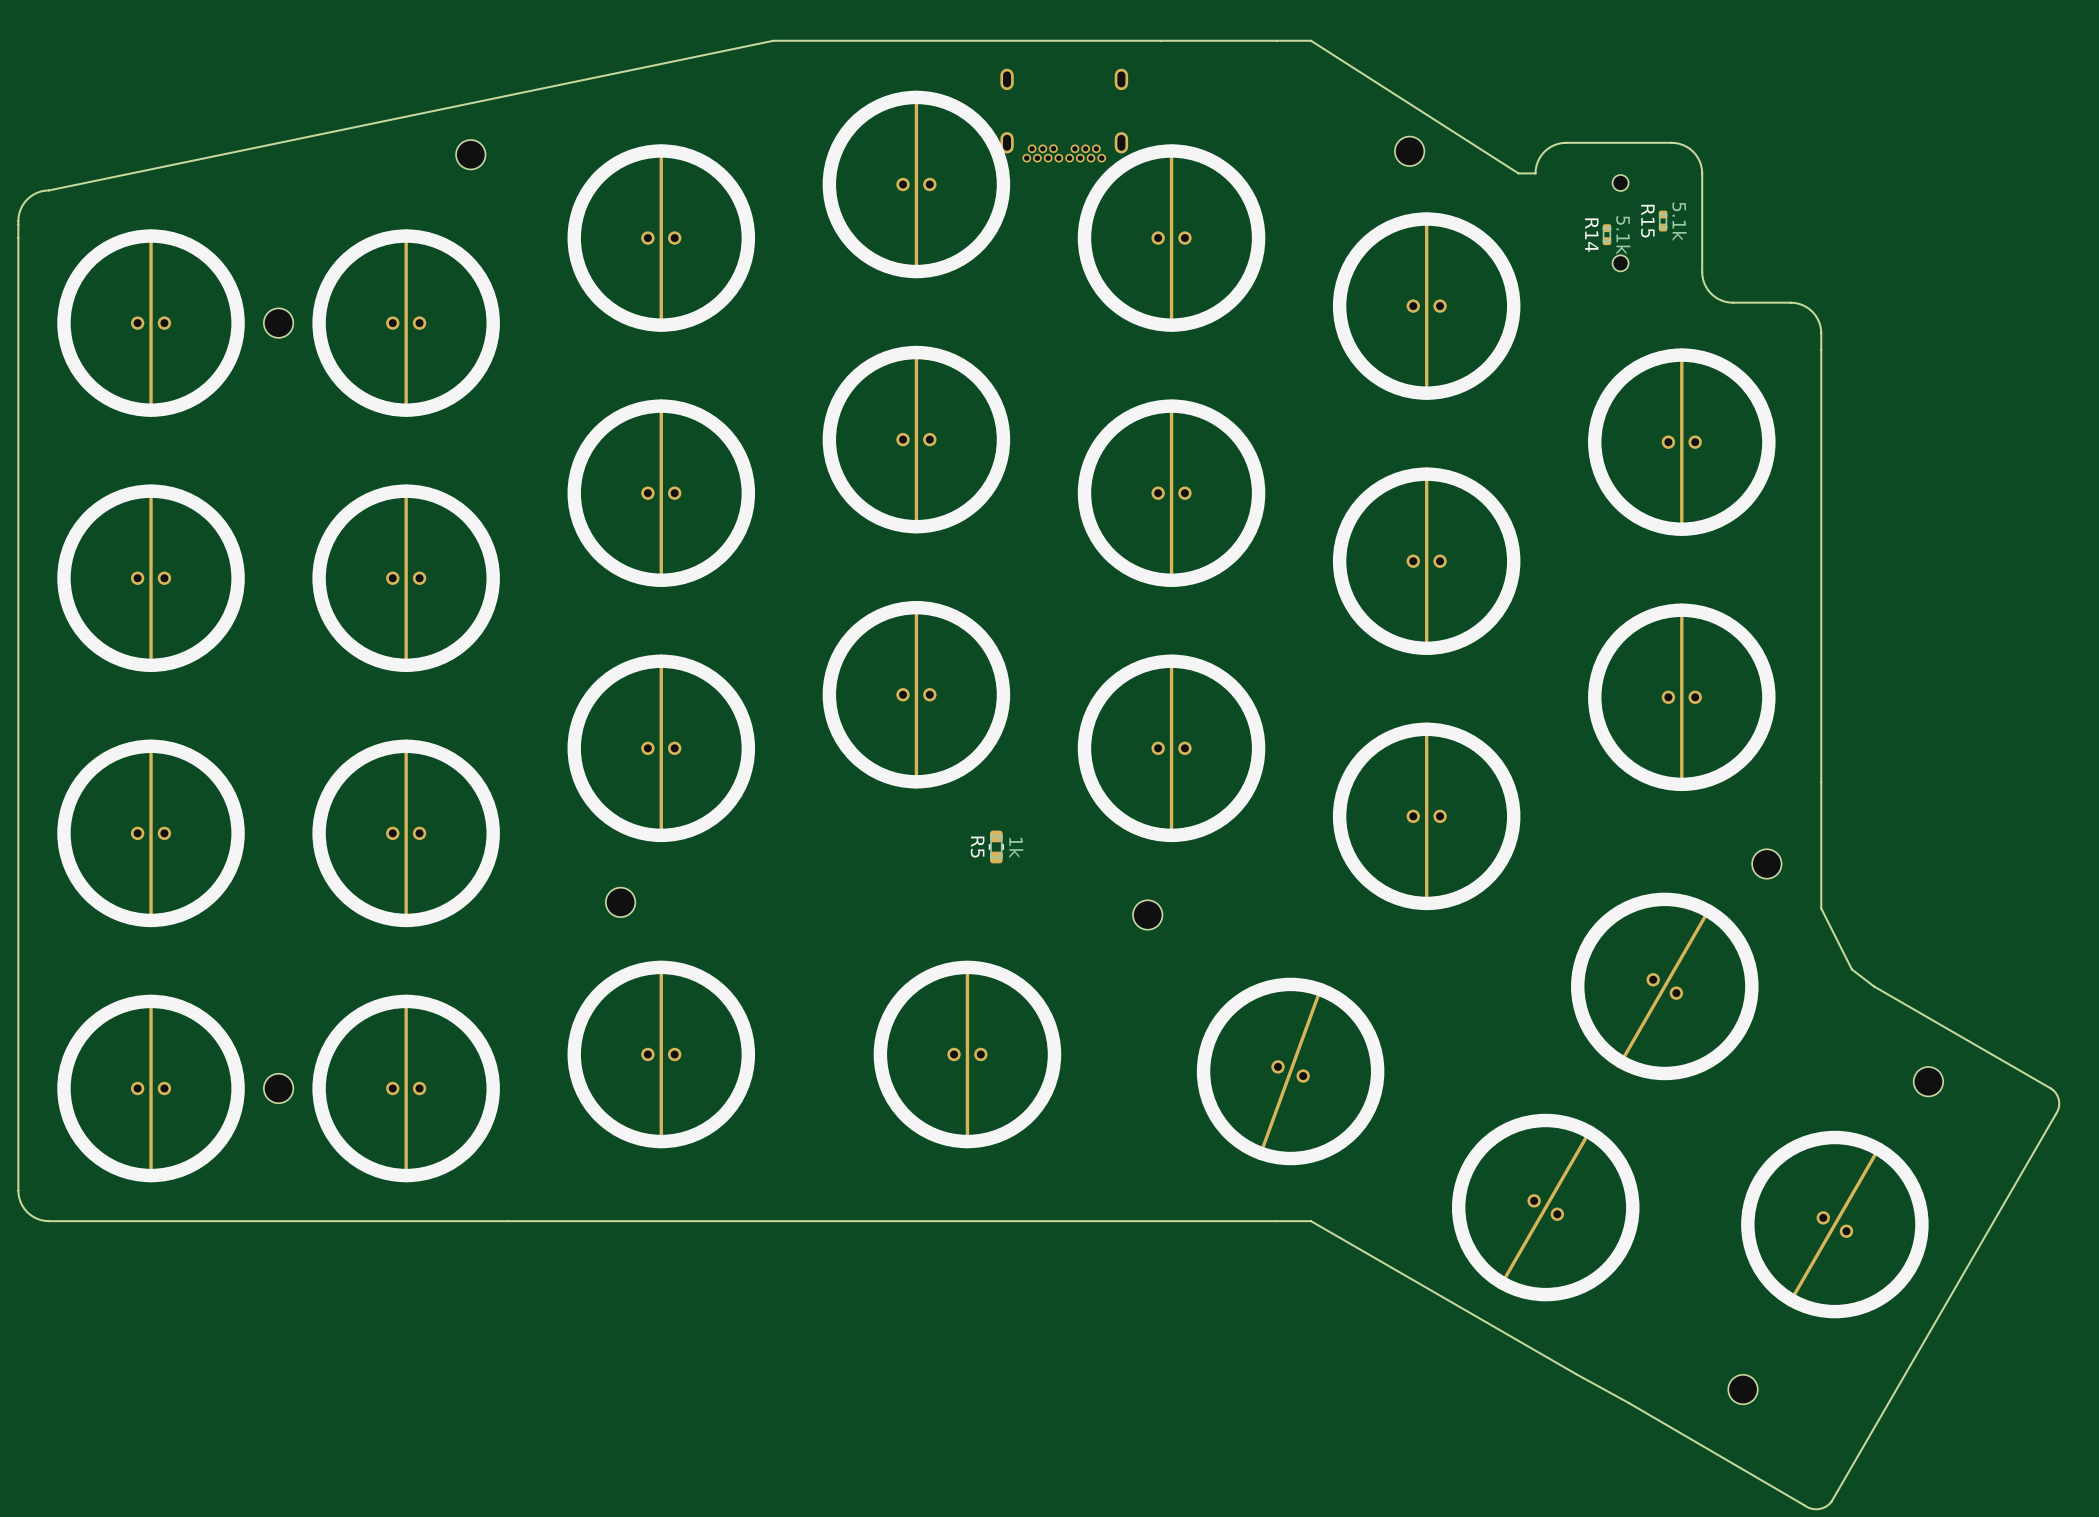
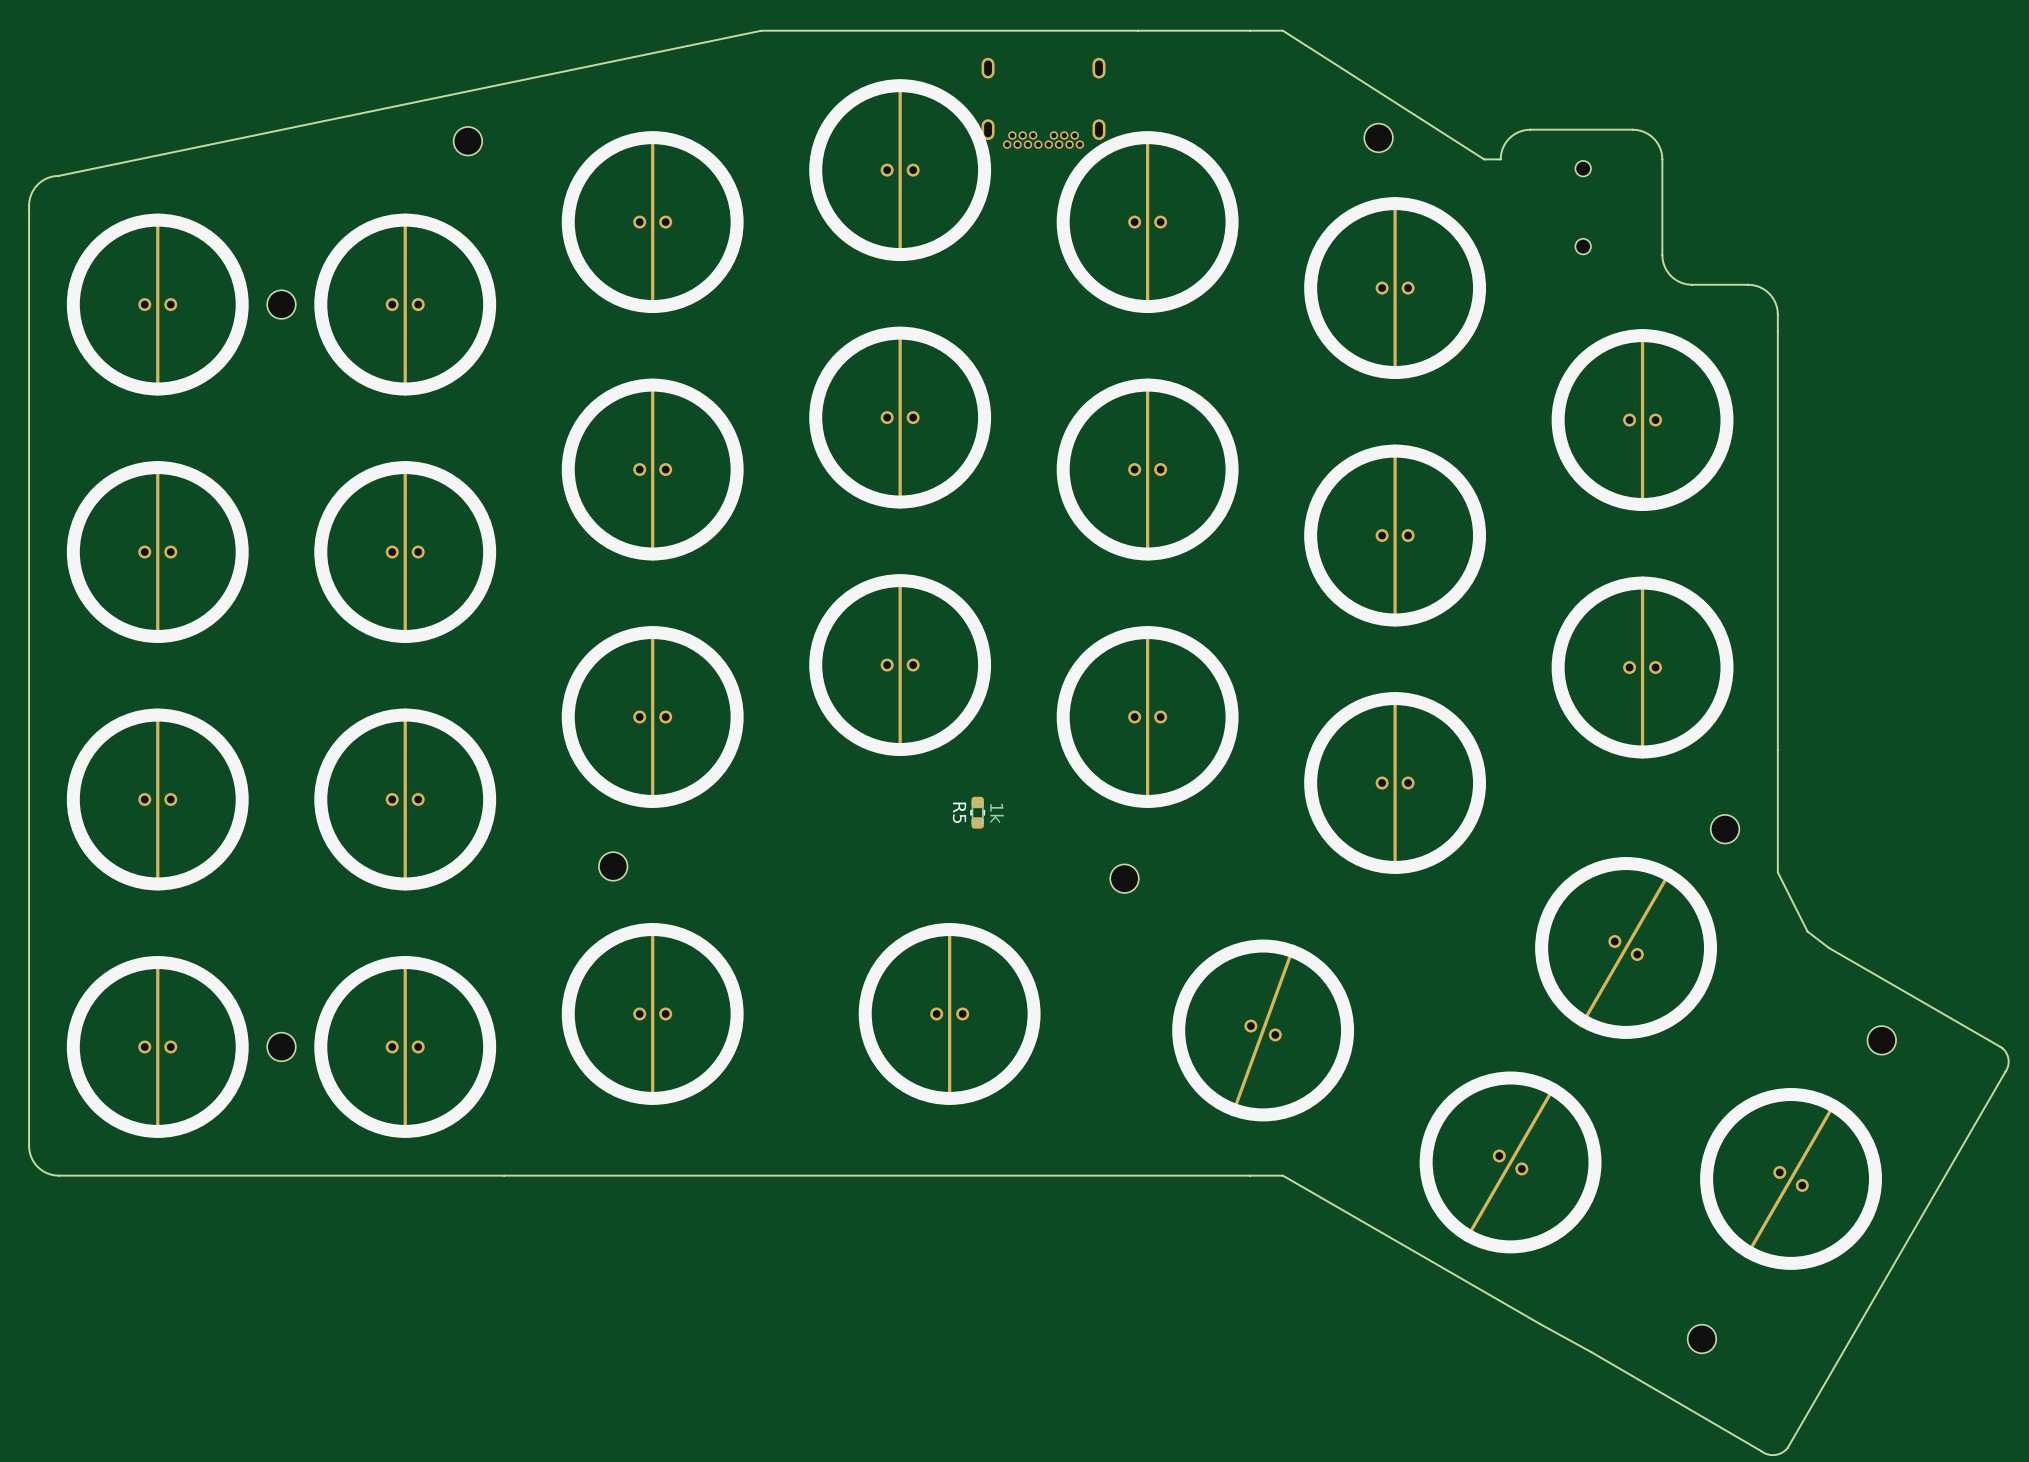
R15: 5.1k (1663, 221) -> none
R14: 5.1k (1606, 234) -> none

